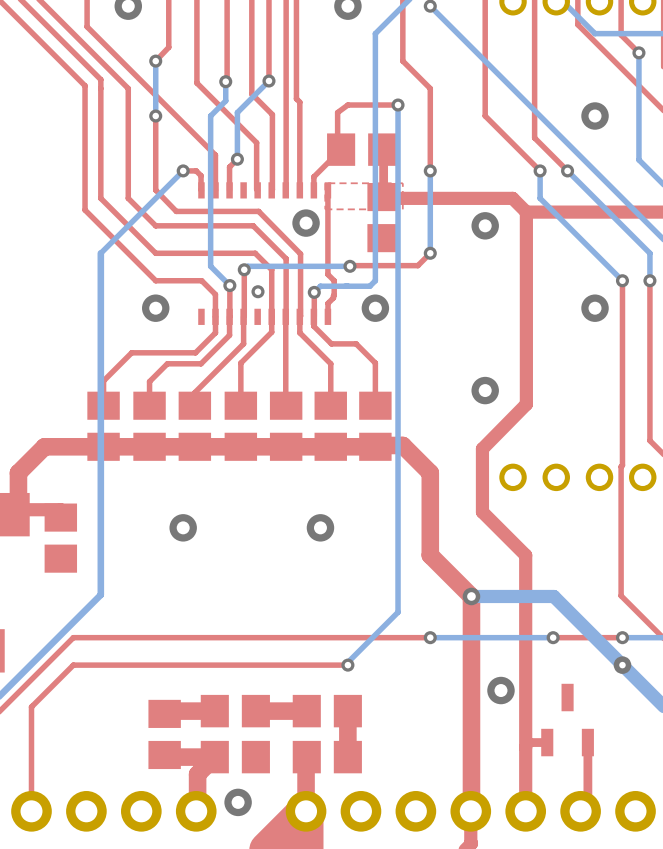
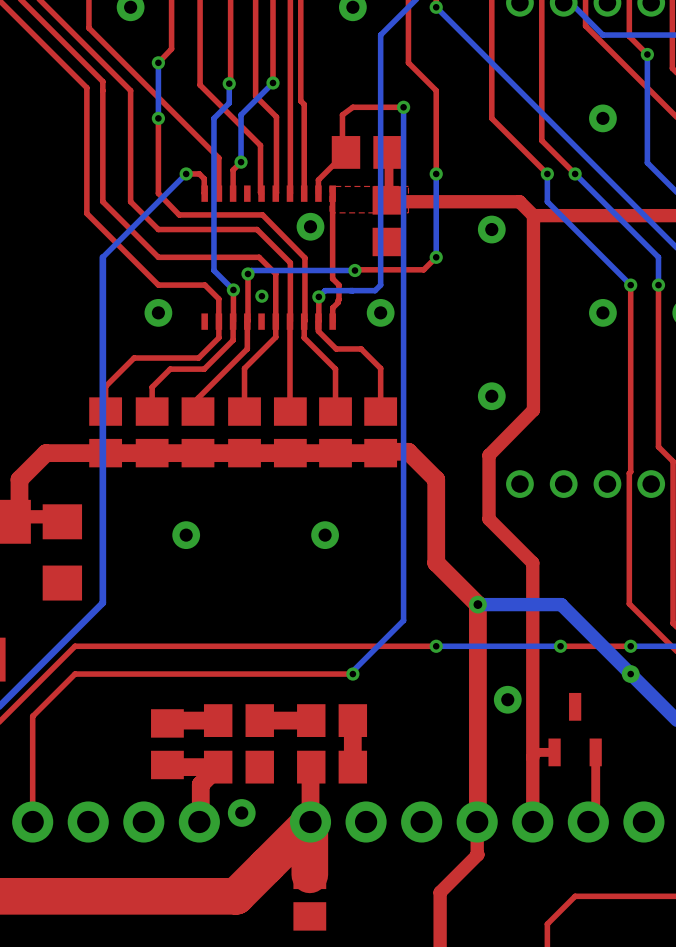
part footprint: [44, 503, 78, 573] -> [42, 504, 83, 601]

